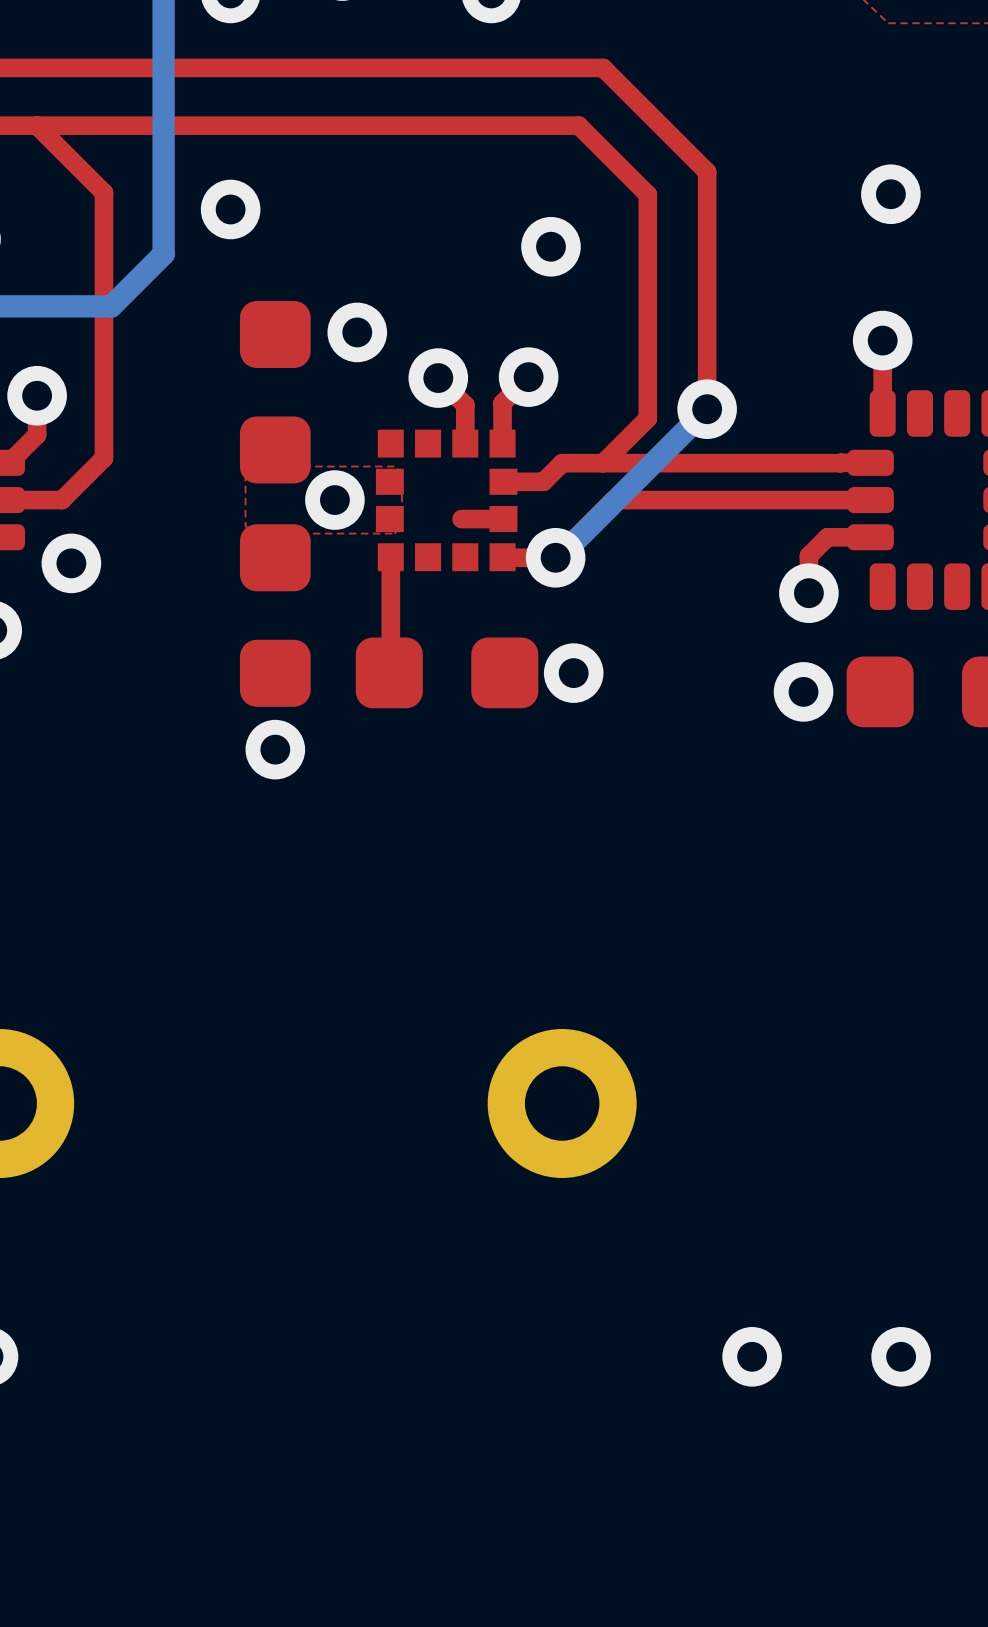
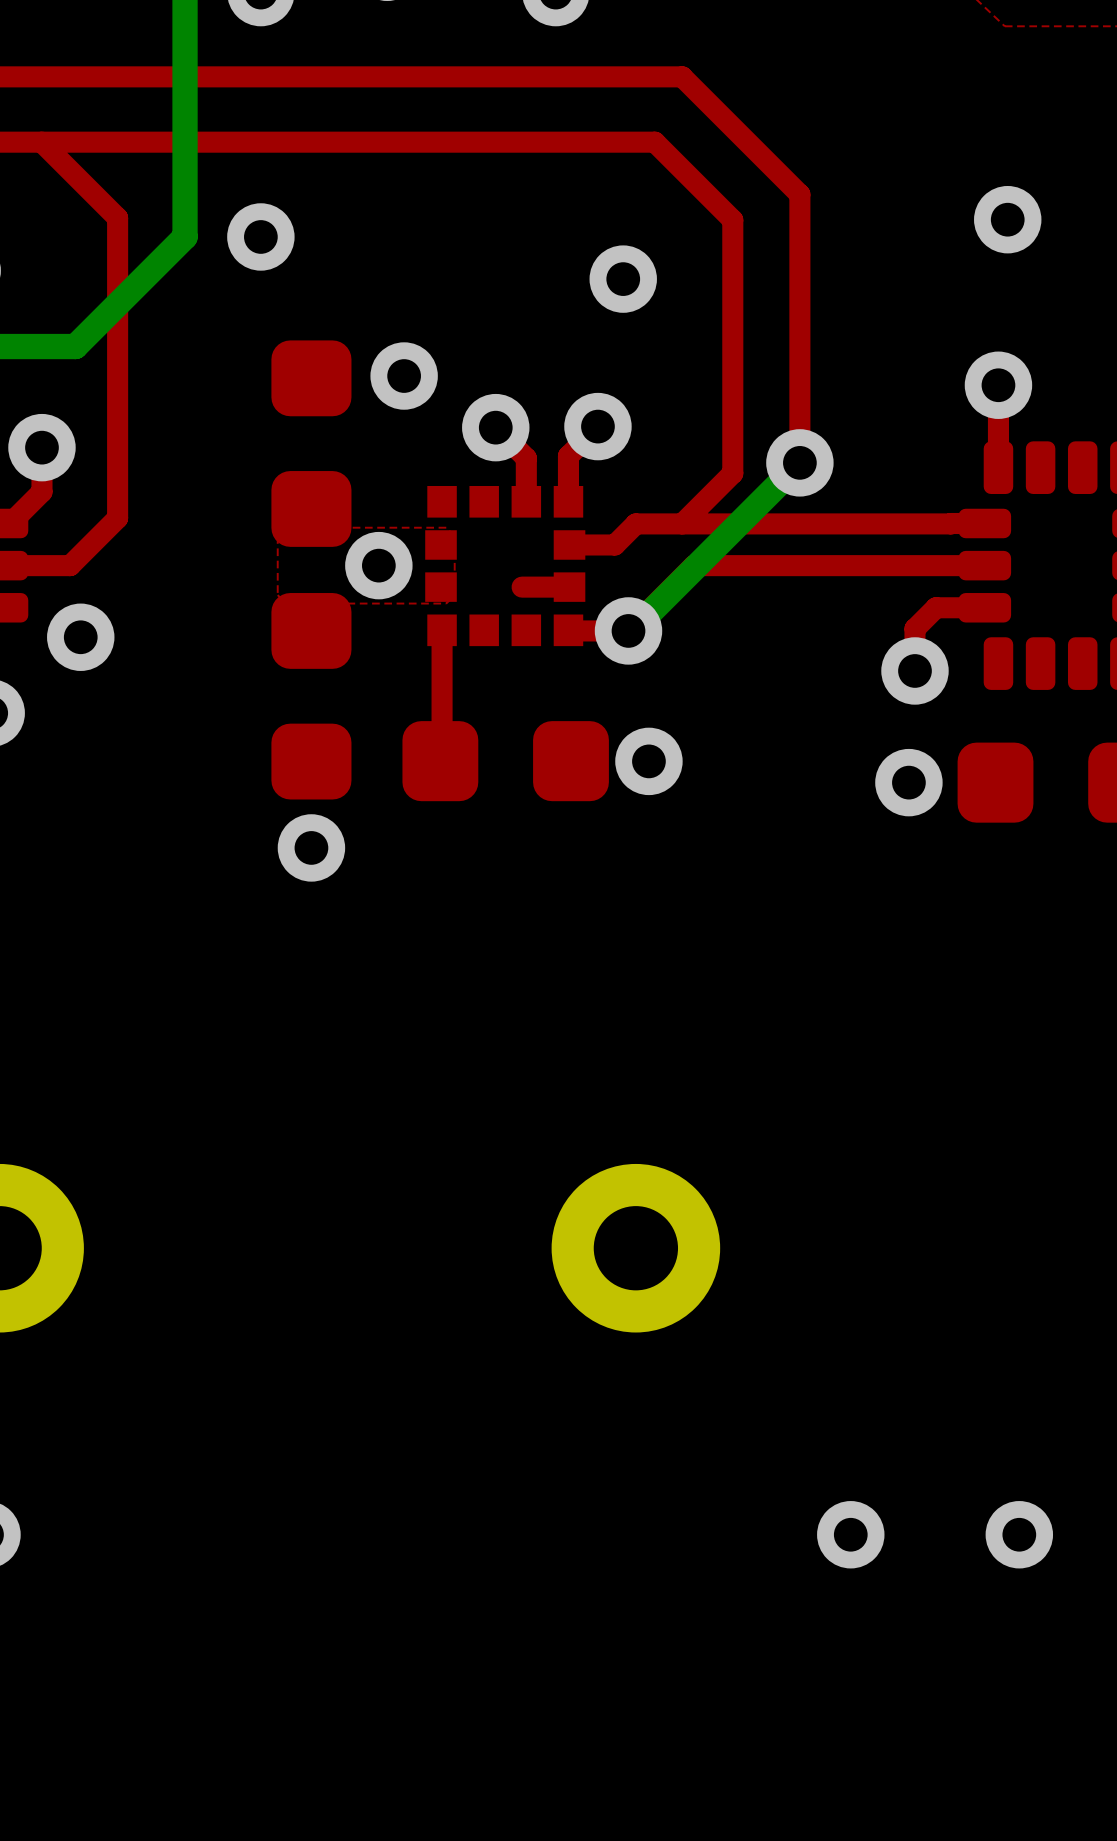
bottom track: (163, 209) (163, 254) (111, 306) (66, 306) -> (185, 236) (75, 346)

